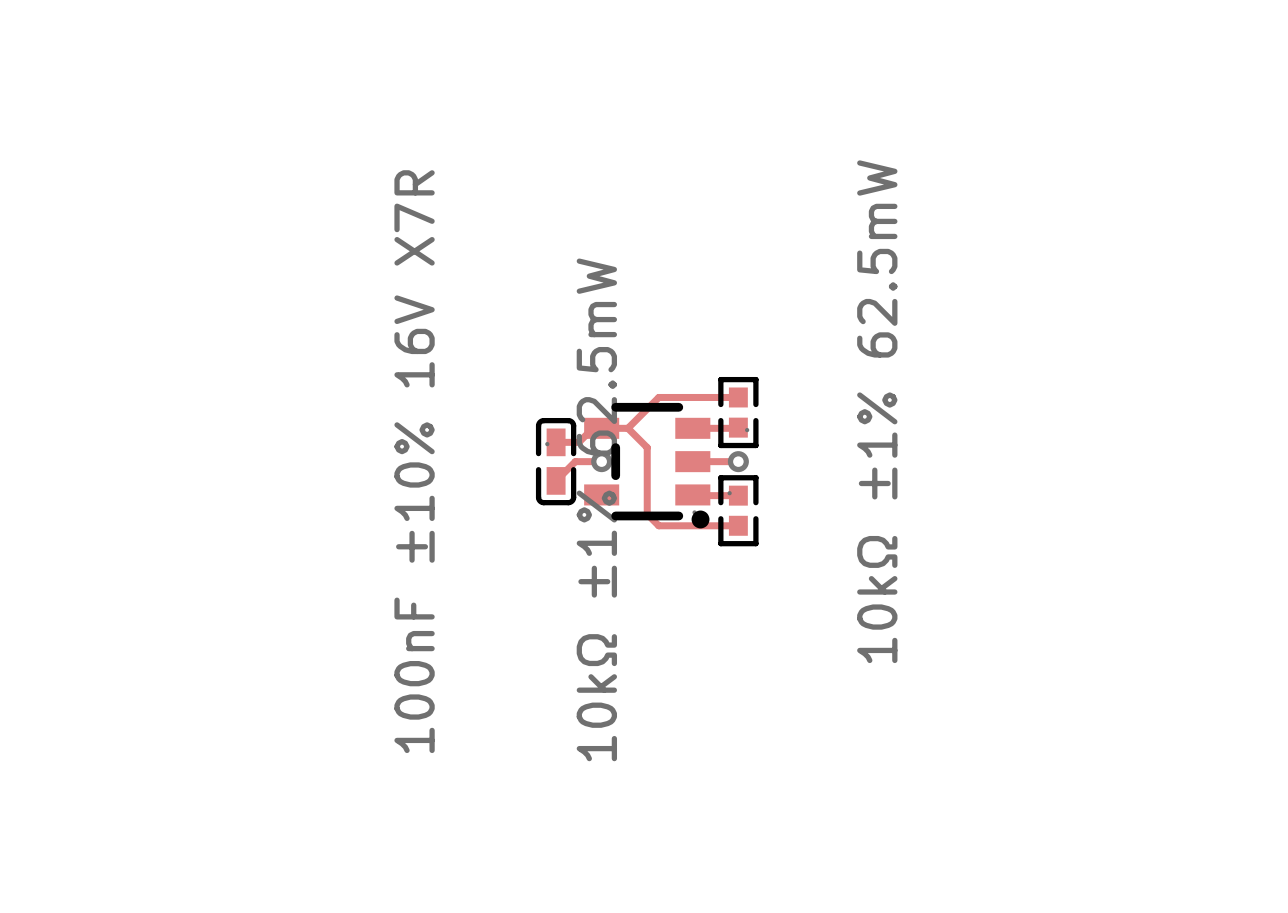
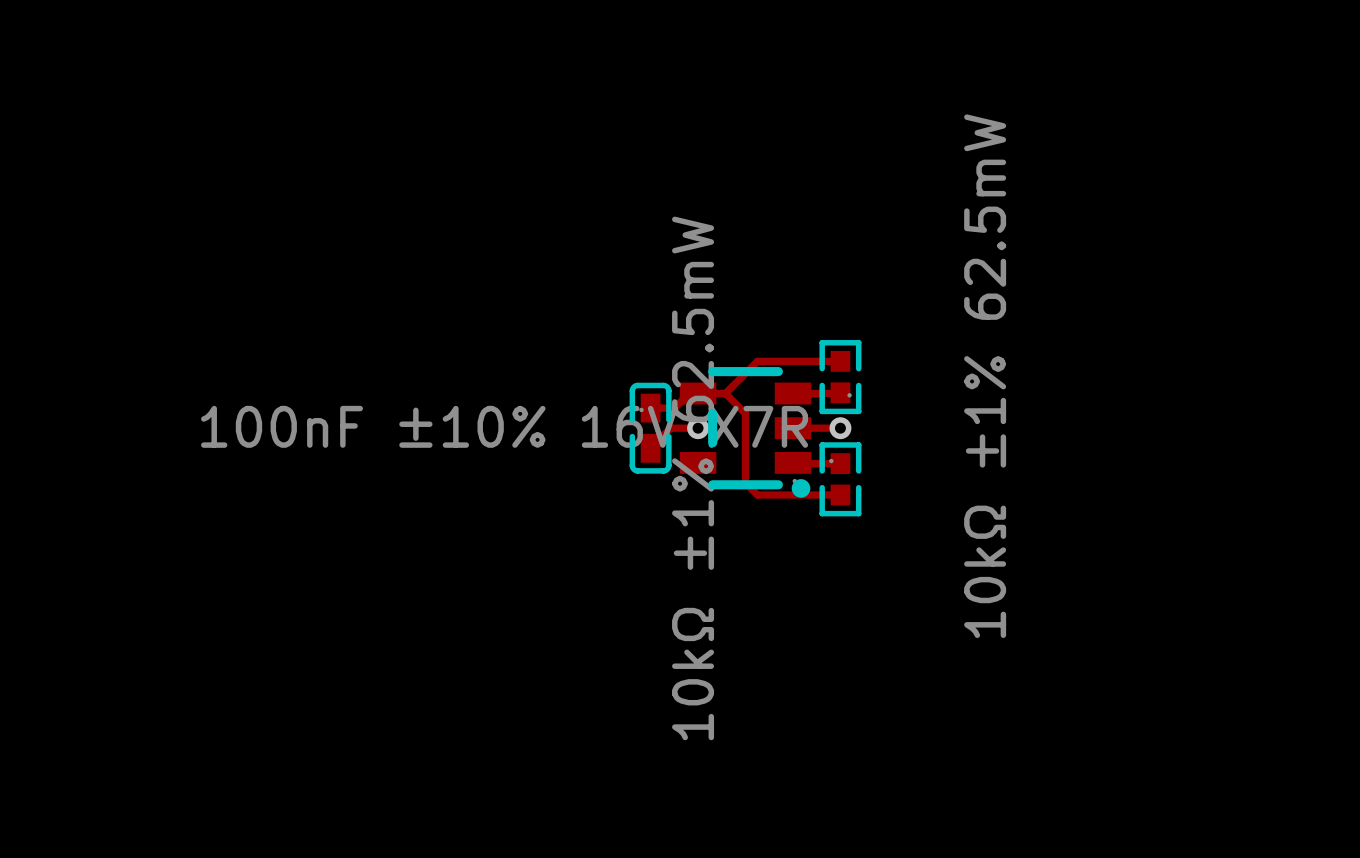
part value rotation: 0° (414, 461) -> 90° clockwise (504, 426)

